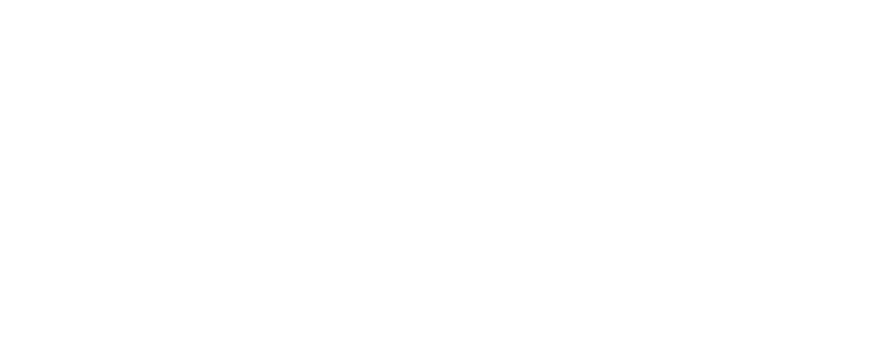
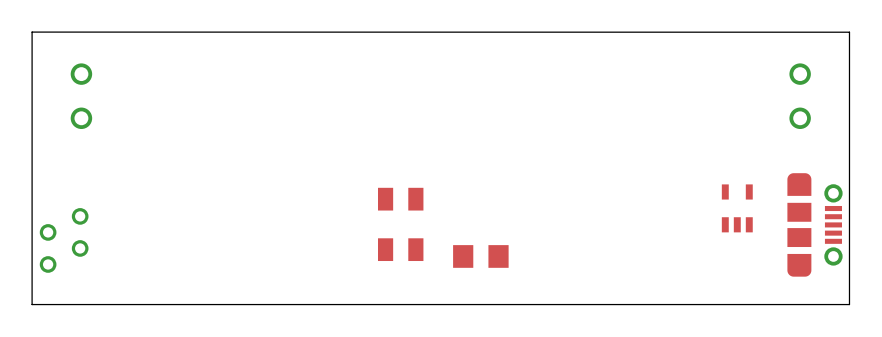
board edge: none -> (32, 32) (32, 304) (849, 304) (849, 32) (32, 32)
part: none -> (81, 96)
part: none -> (800, 96)
part: none -> (737, 208)
part: none -> (400, 224)
part: none -> (815, 224)
part: none -> (64, 240)
part: none -> (480, 256)

